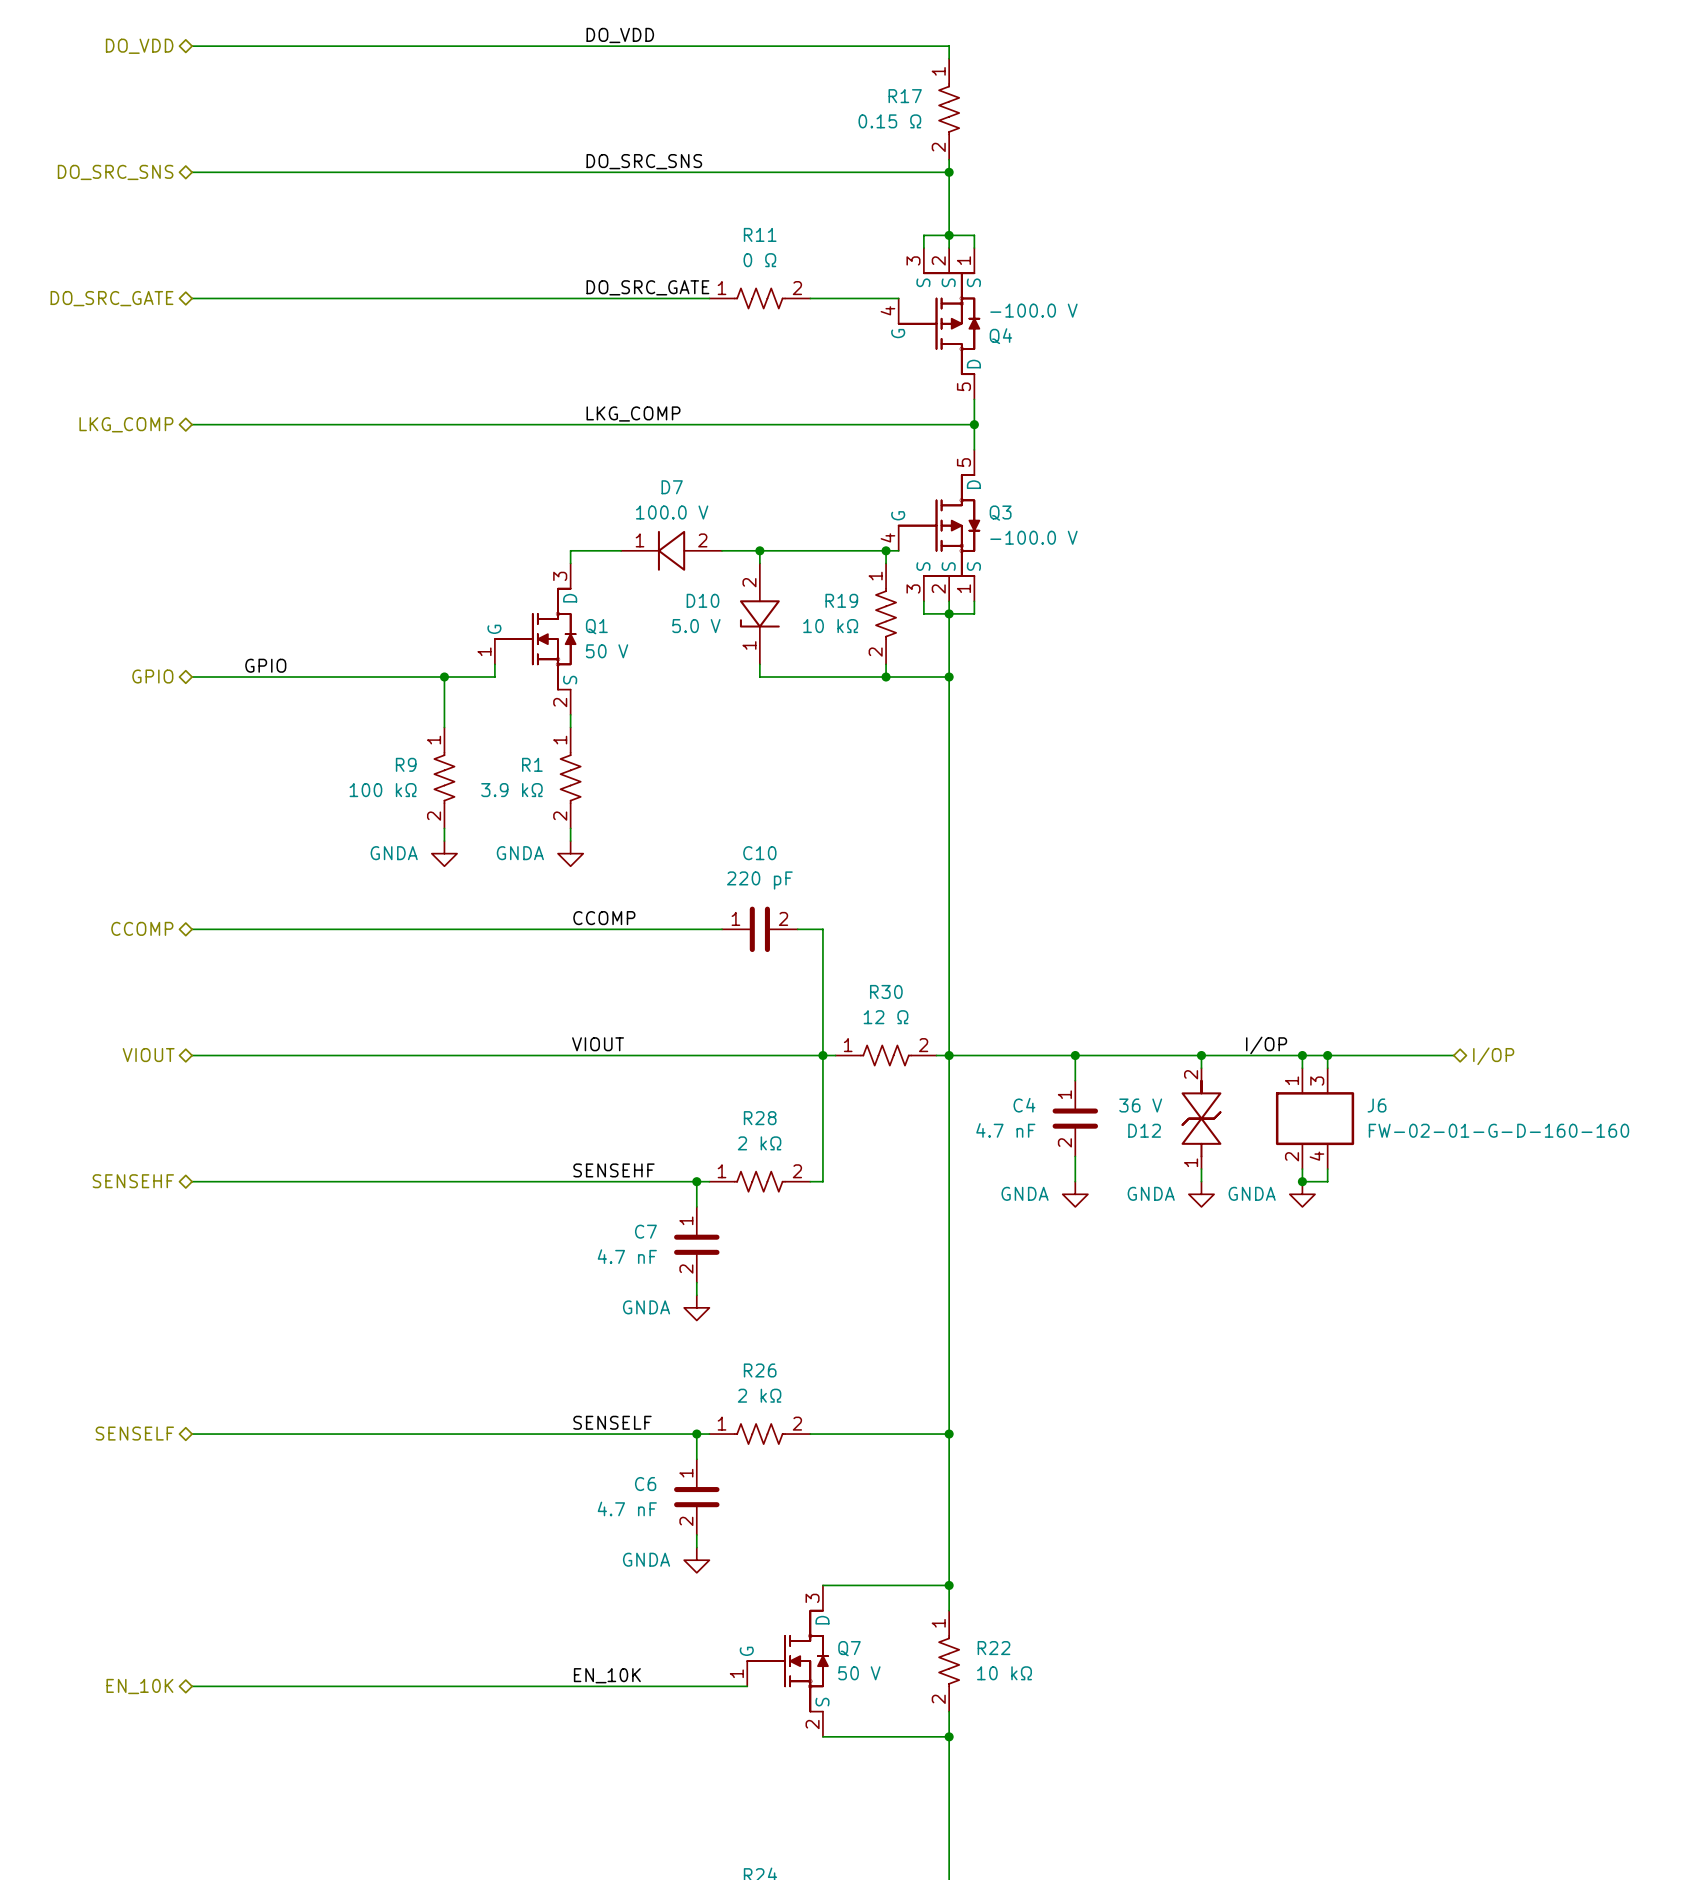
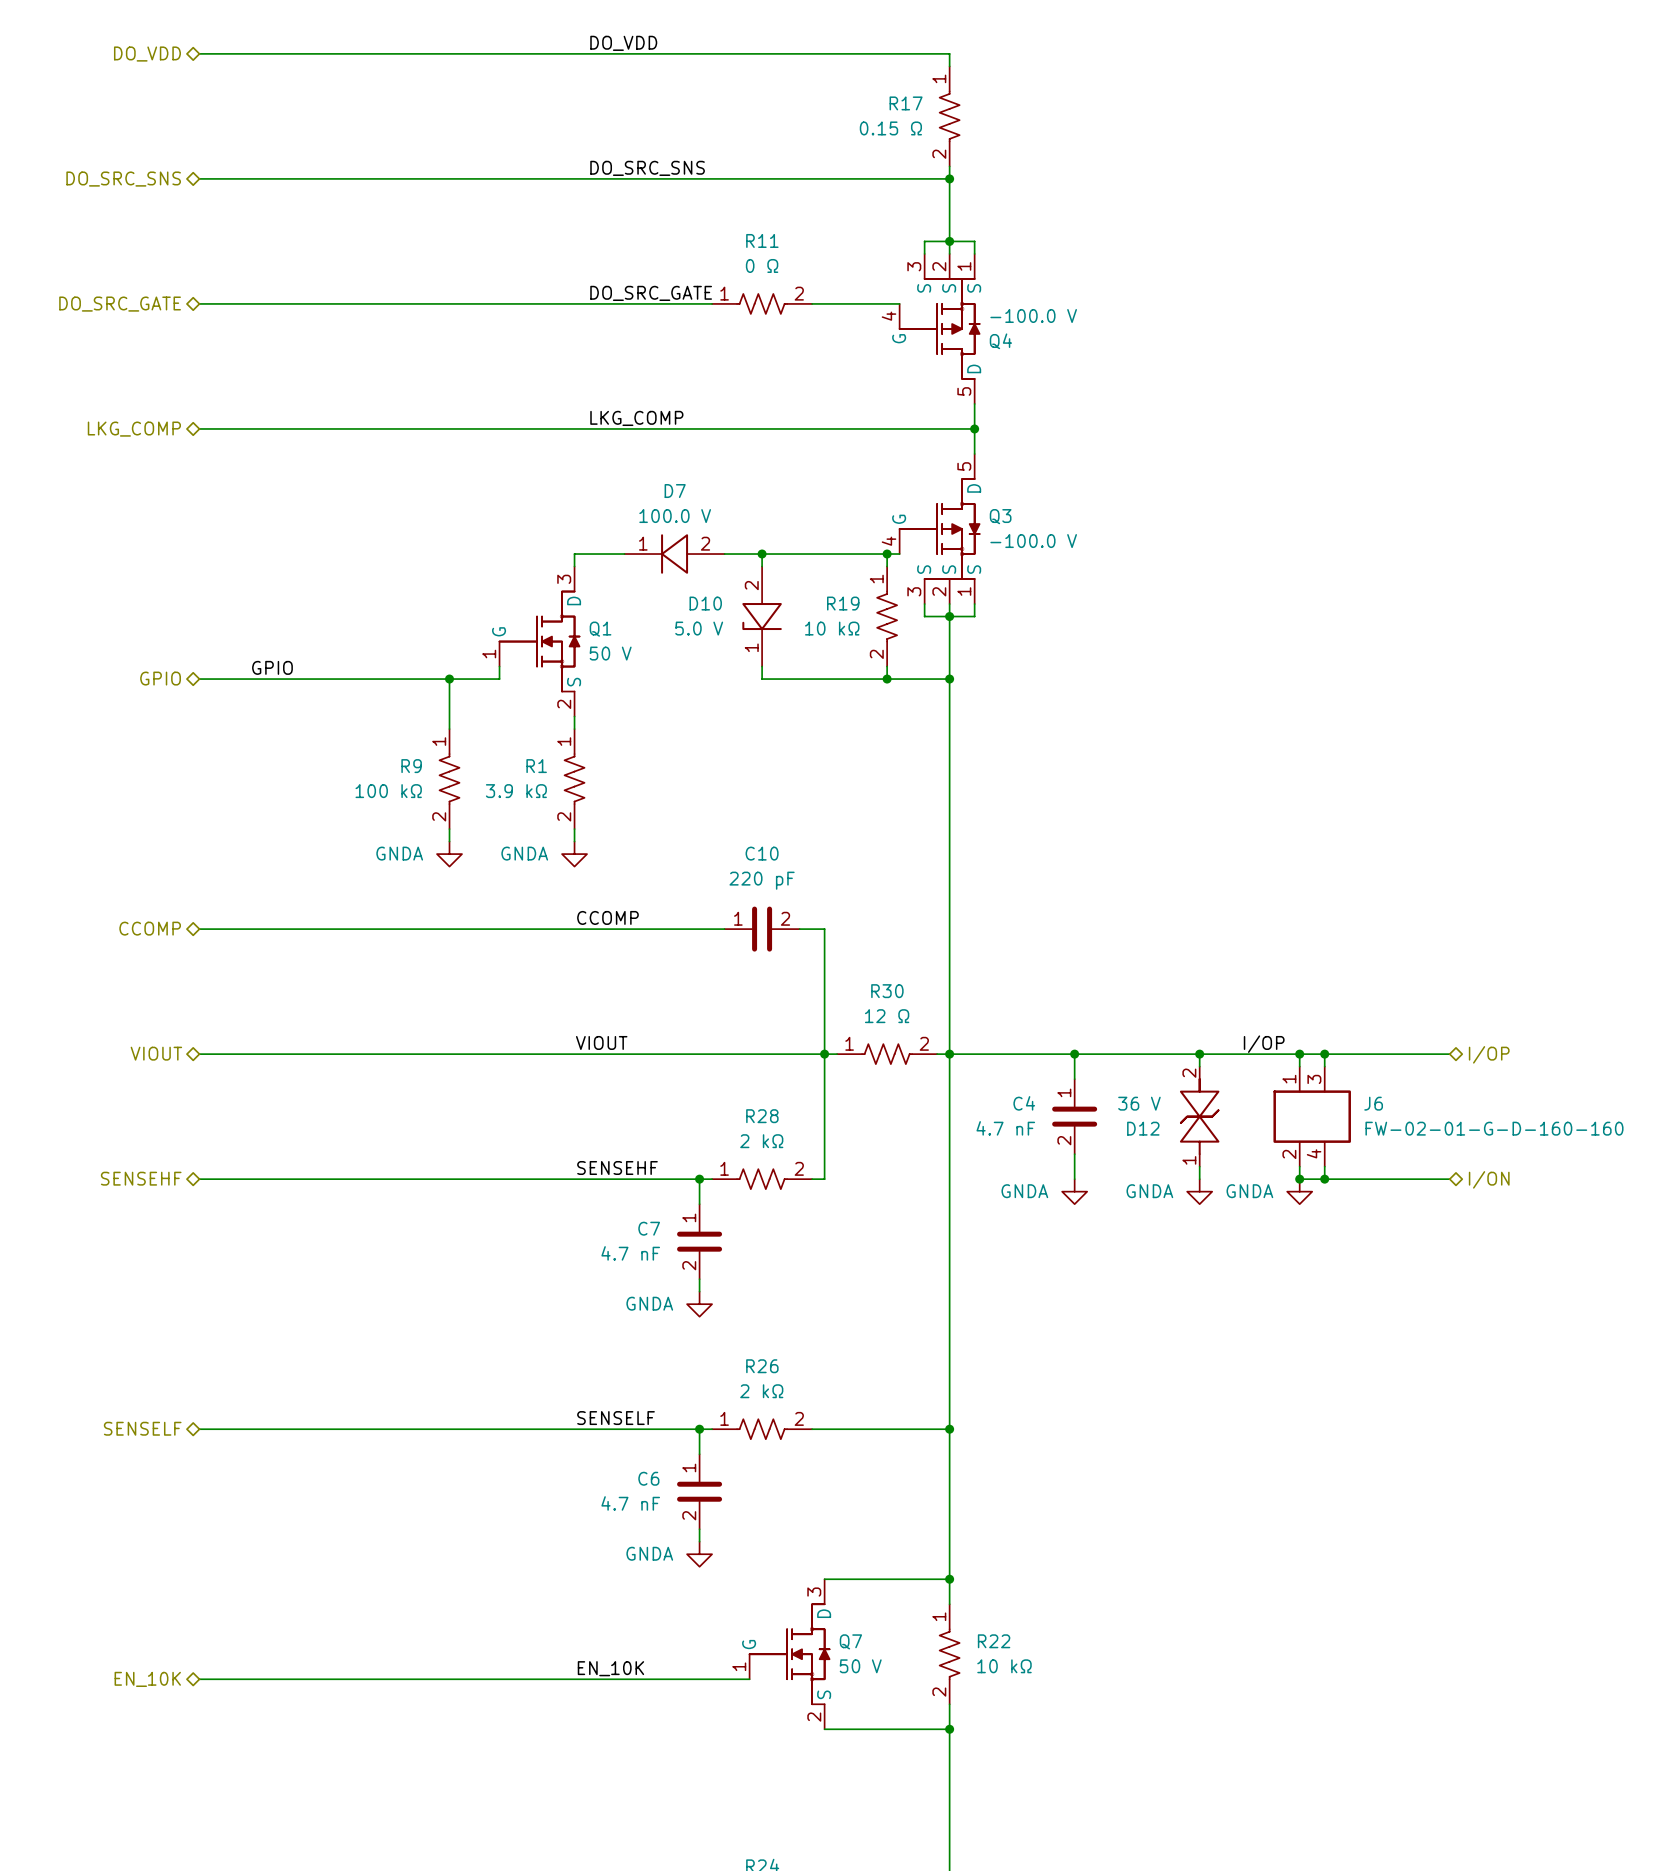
wire: none -> (1324, 1179) (1449, 1179)
junction: none -> (1324, 1179)
hierarchical label: none -> I/ON (1489, 1179)

